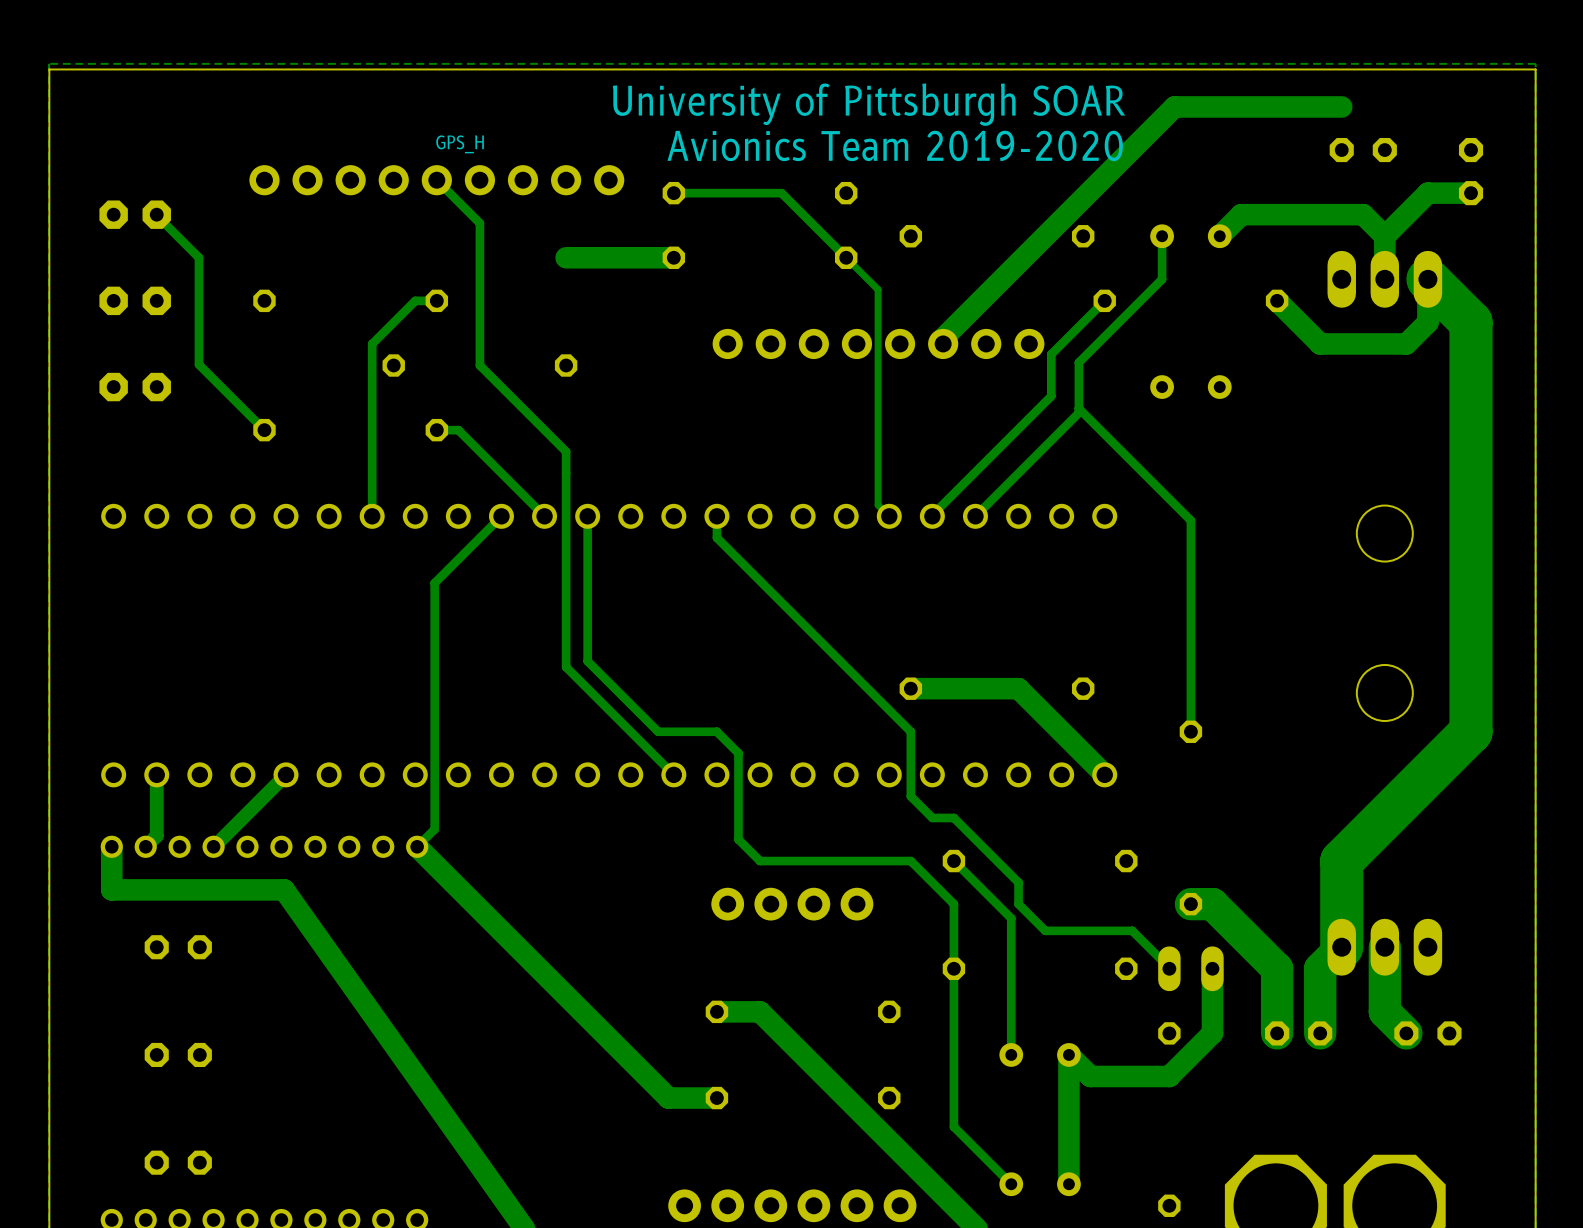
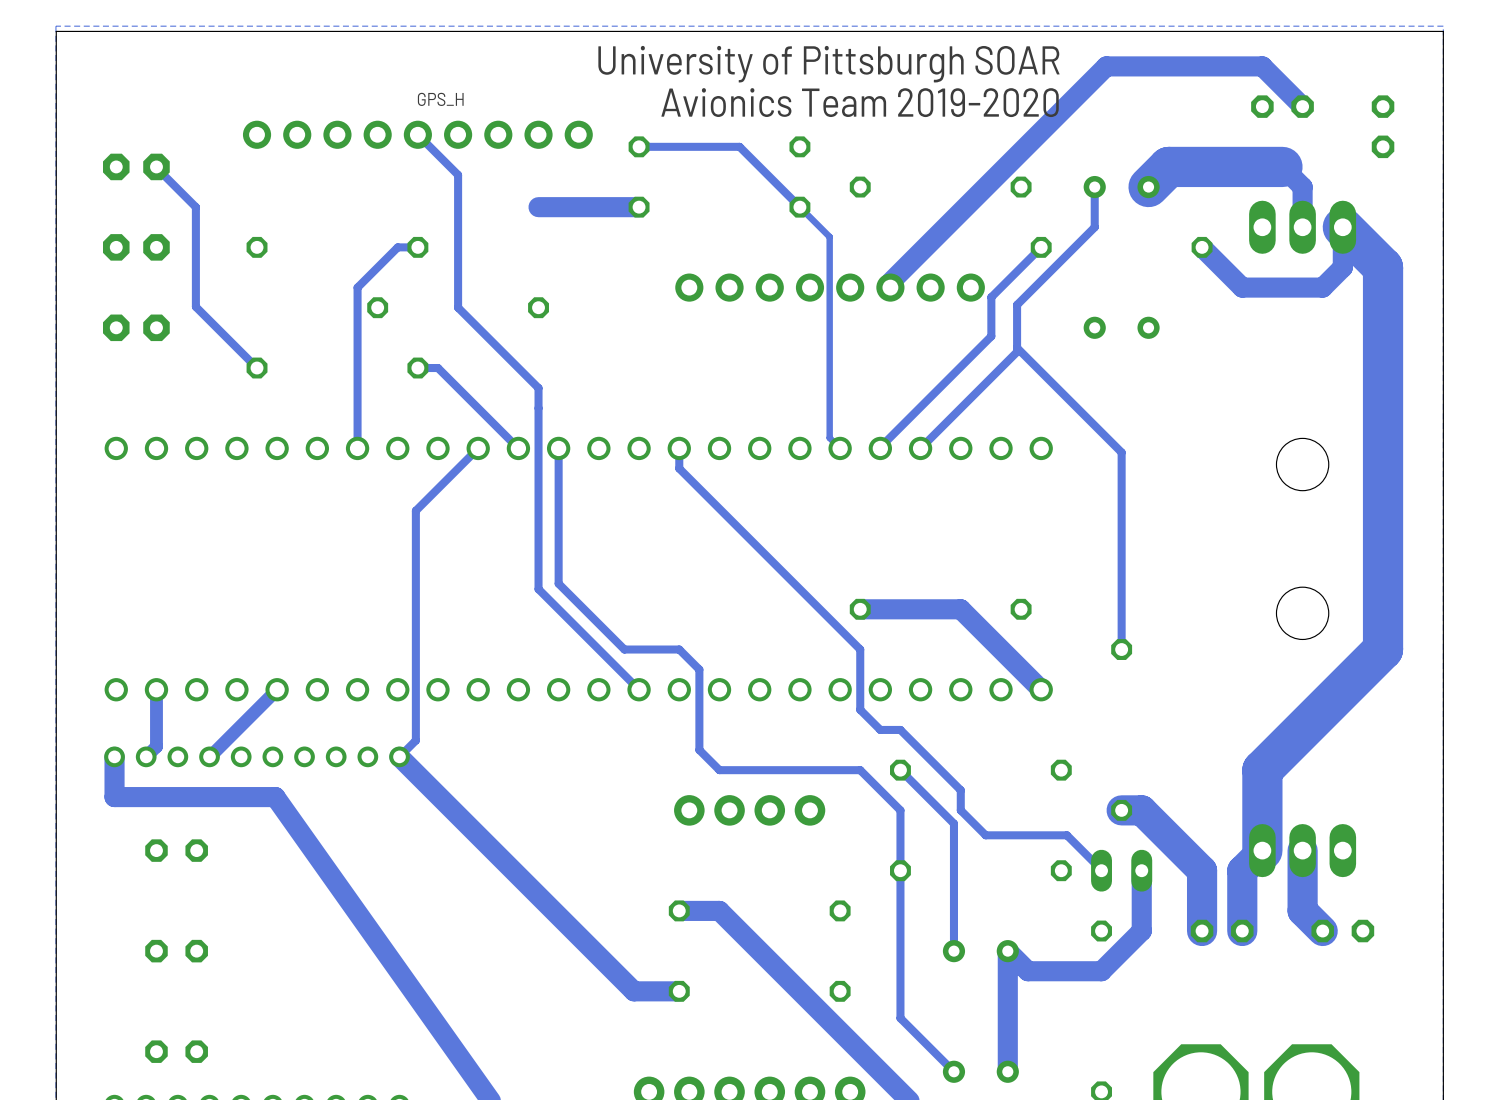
track: none -> (1262, 66) (1302, 106)
track: (1471, 193) (1427, 193) (1384, 236) -> none
track width: thin (1363, 214) (1241, 214) (1219, 236) -> thick (1282, 166) (1168, 166) (1148, 187)

